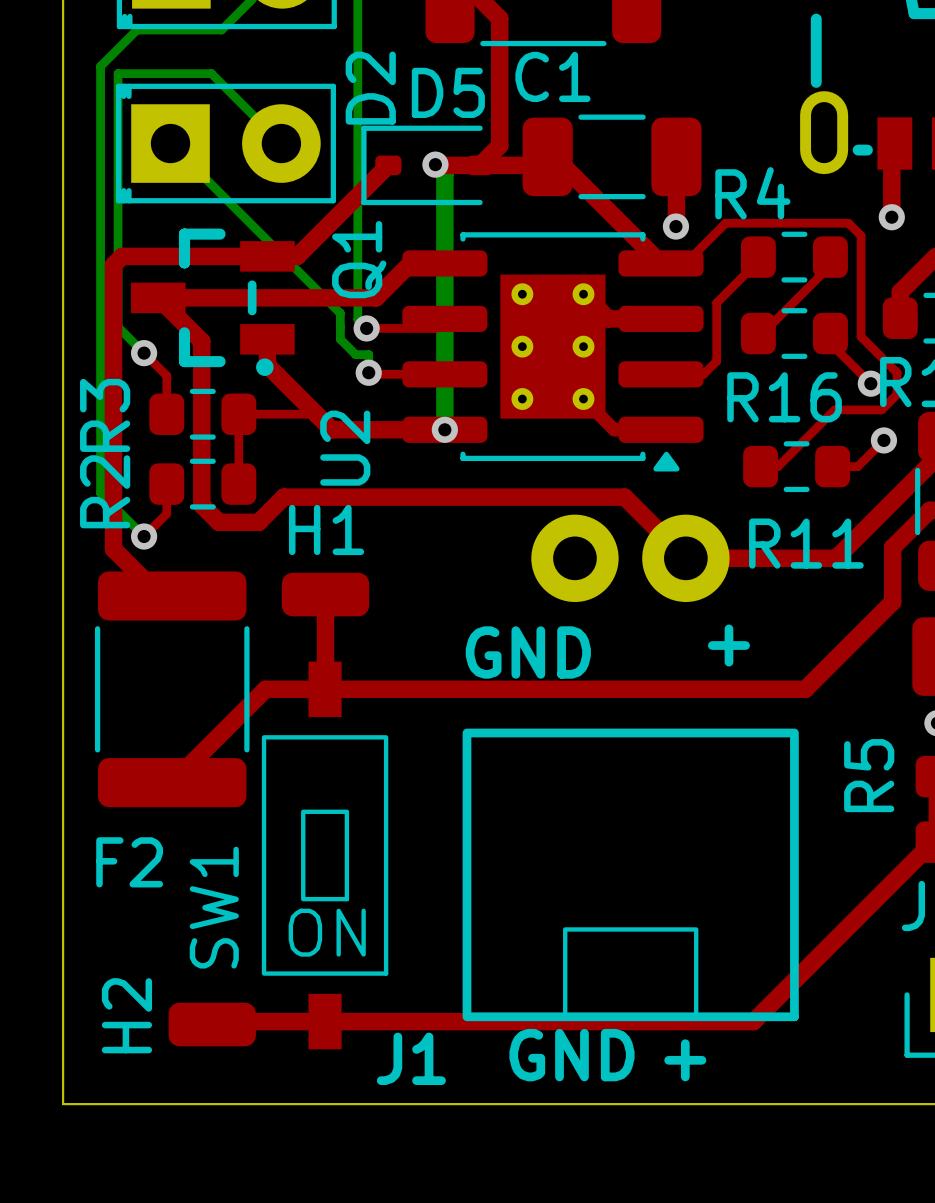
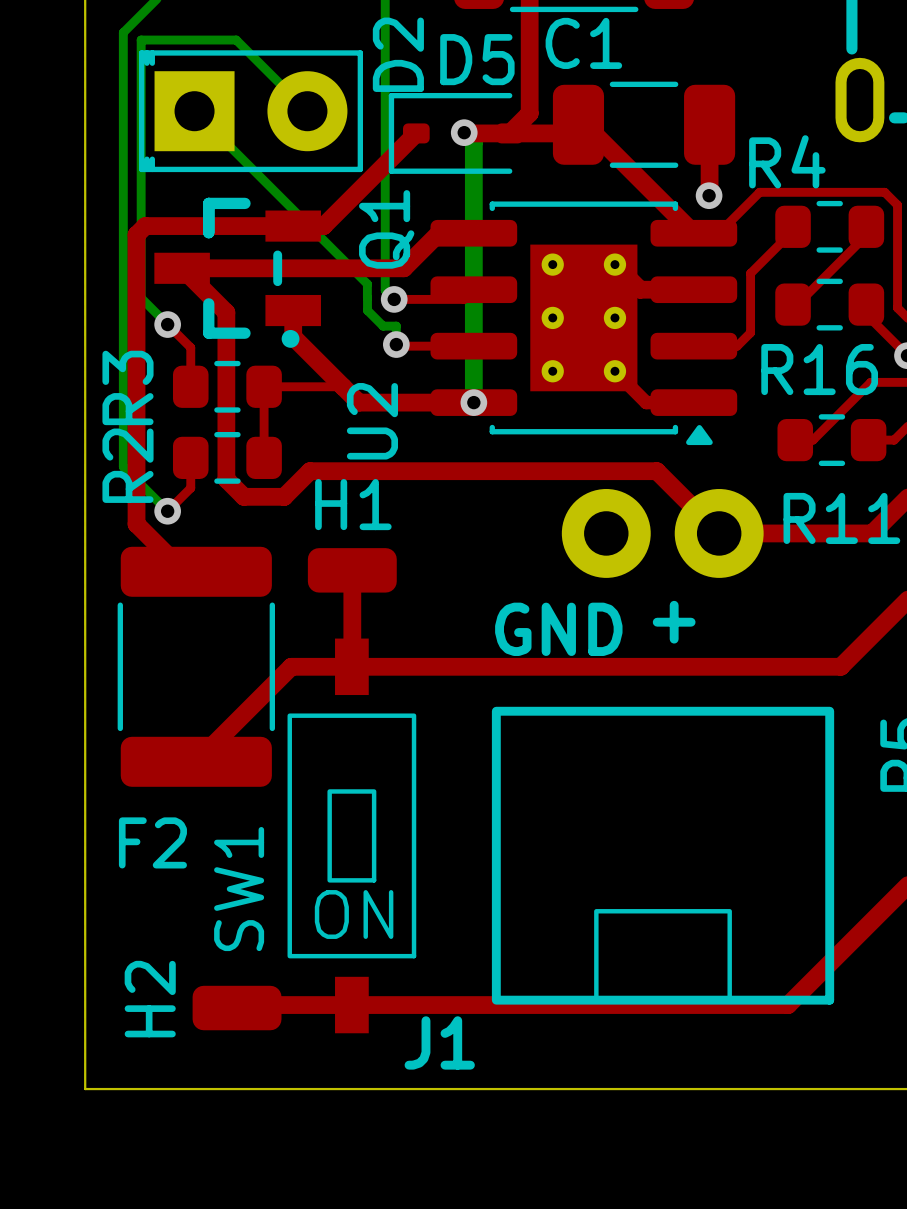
text position: + (728, 645) -> + (674, 622)
text: GND (571, 1055) -> none
text: + (685, 1060) -> none

